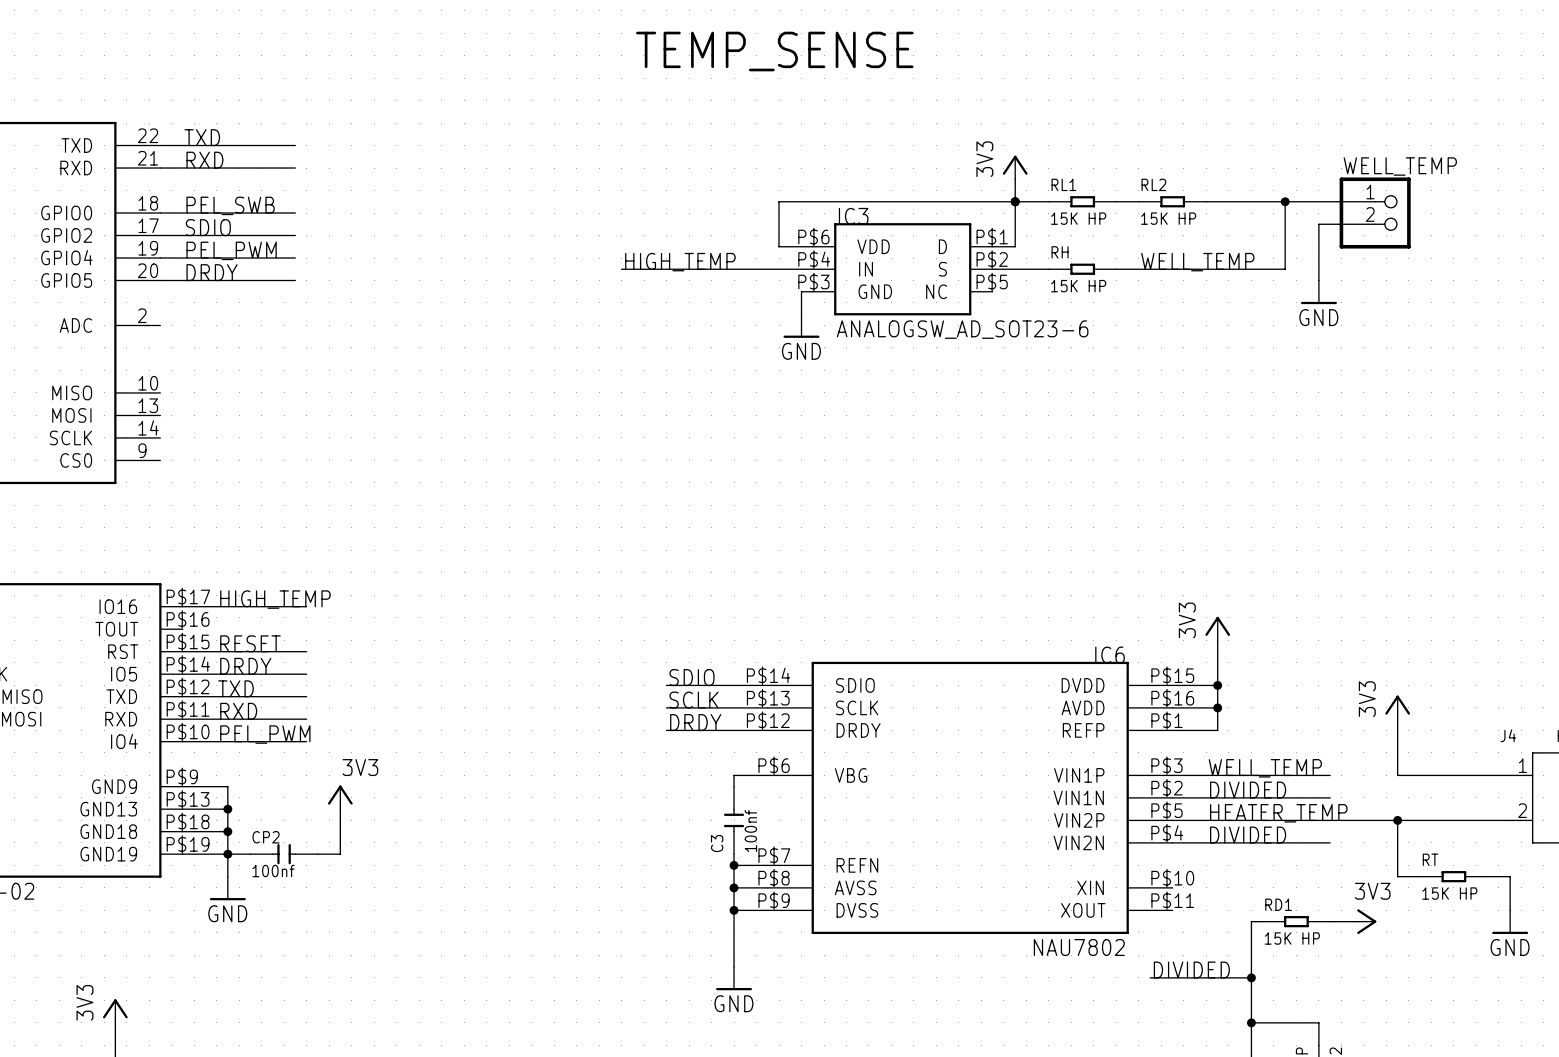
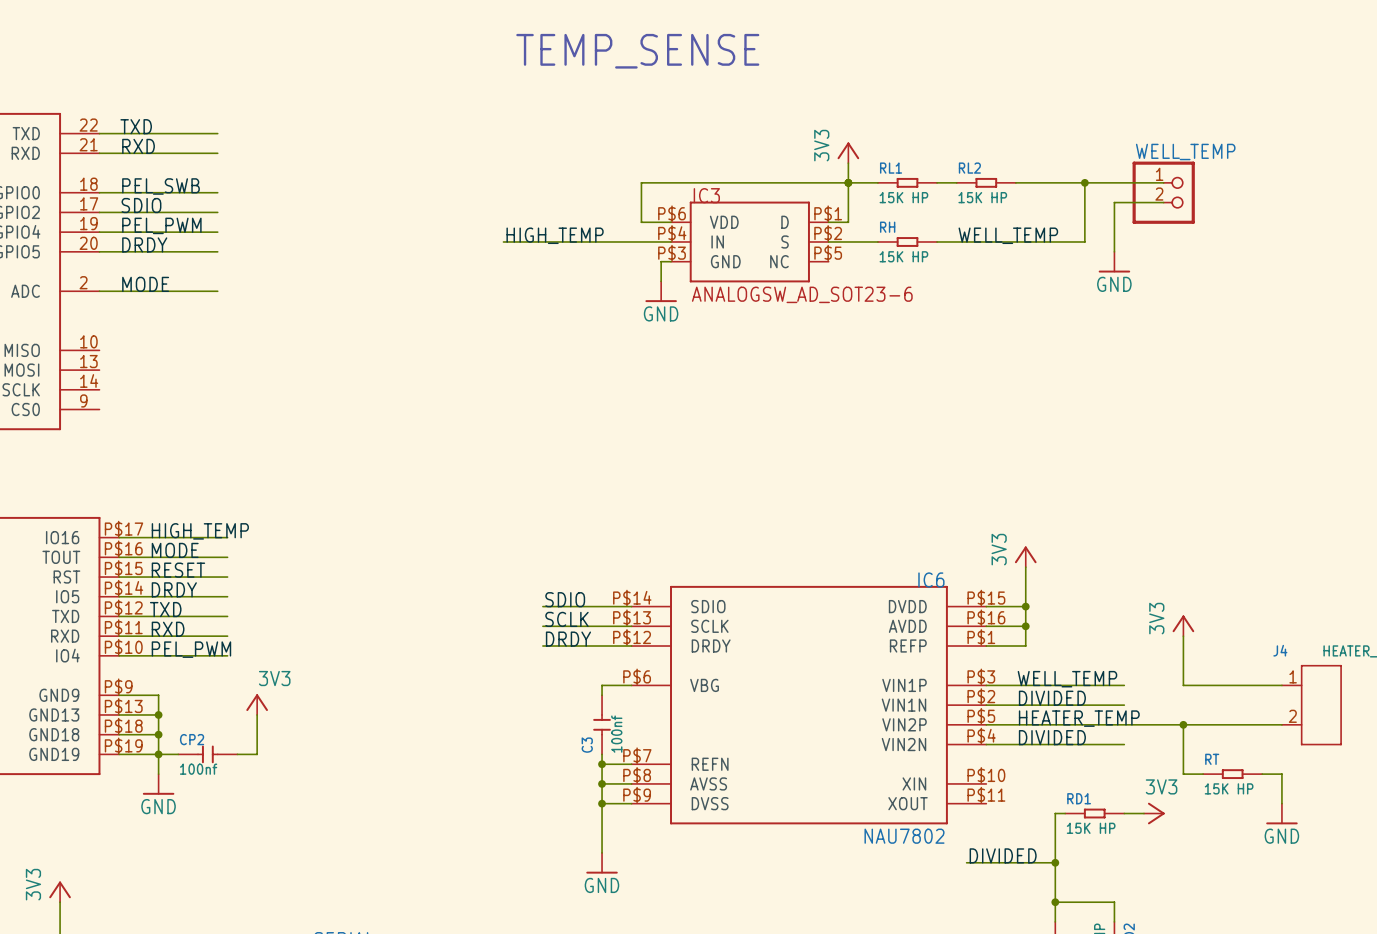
label: none -> MODE (145, 284)
wire: none -> (99, 291) (217, 291)
label: none -> MODE (175, 550)
wire: none -> (119, 557) (227, 557)

